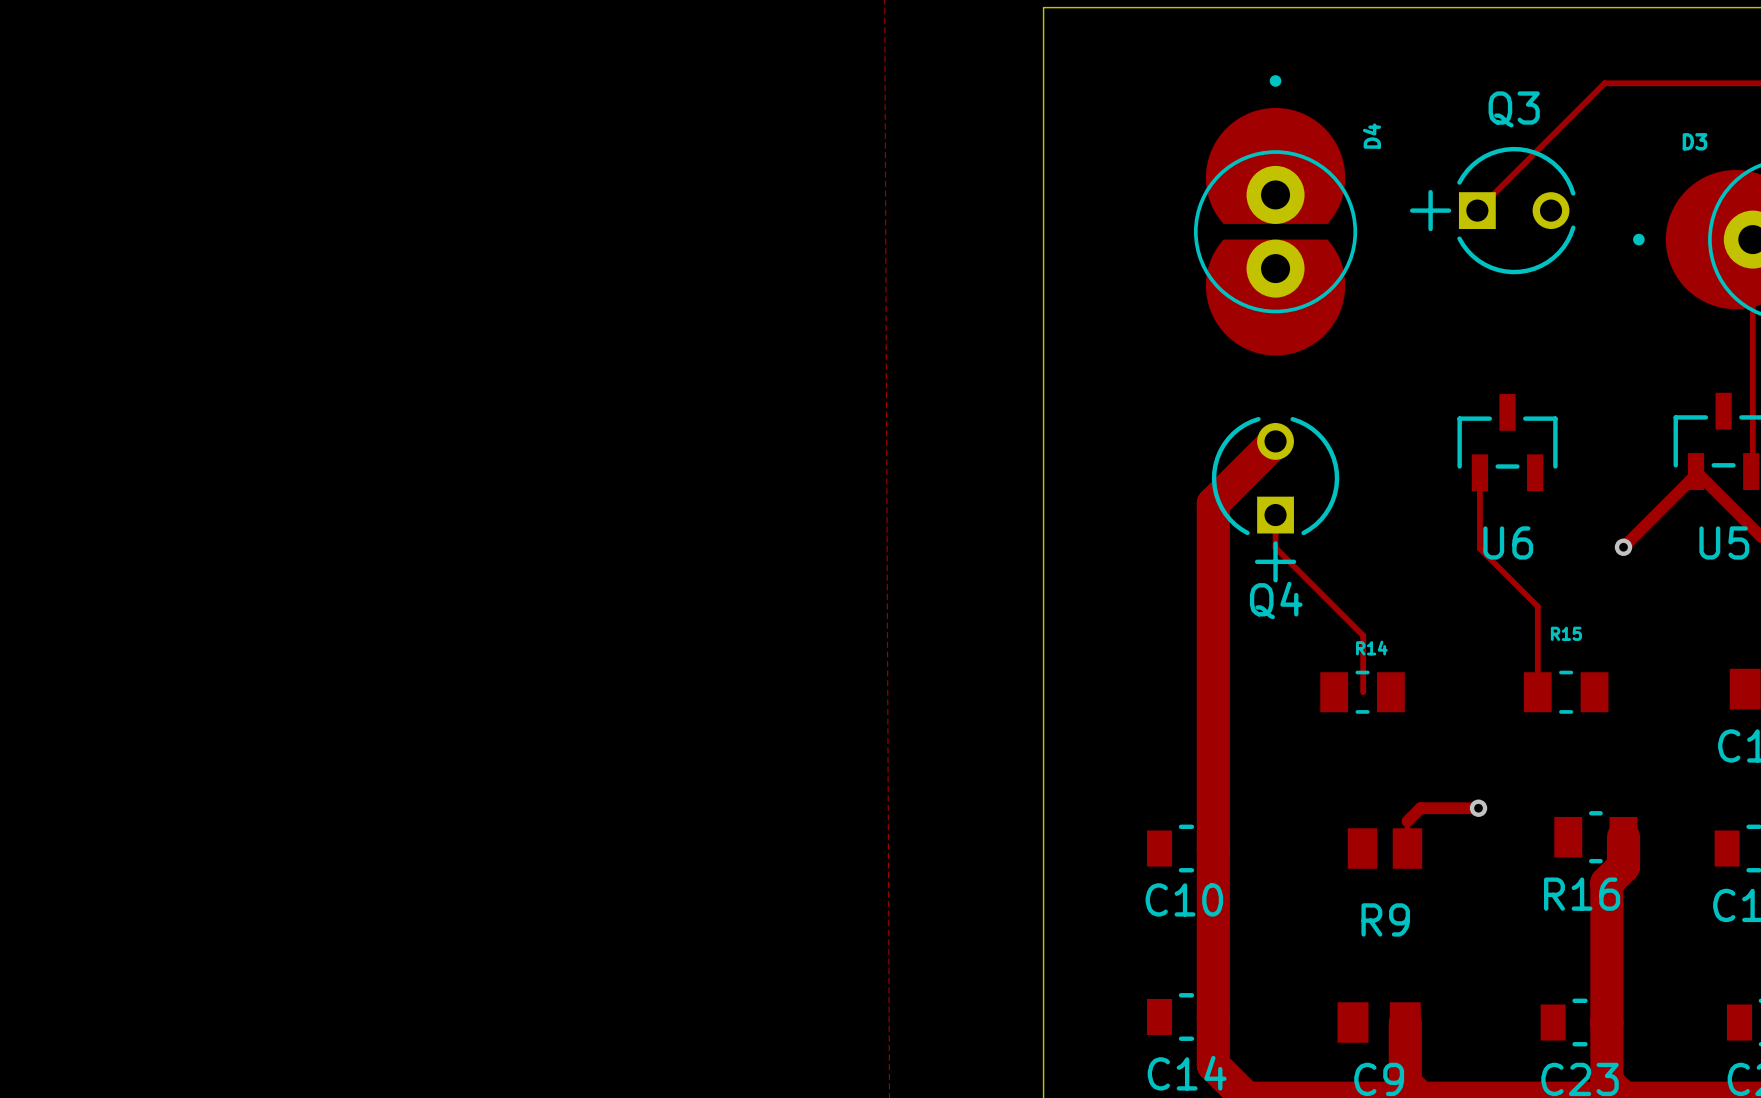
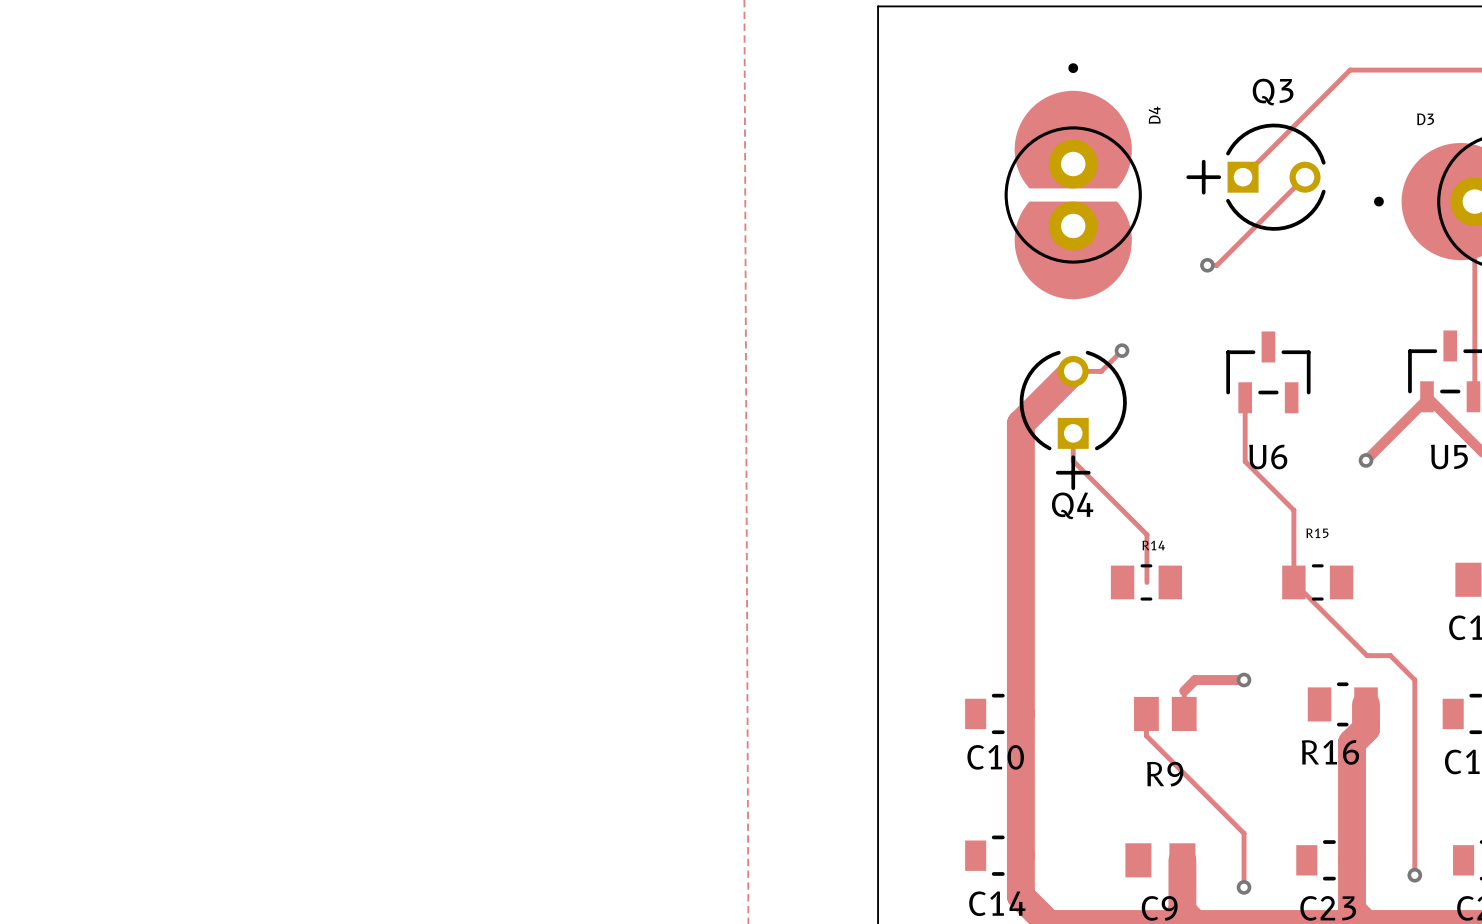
track: none -> (1305, 177) (1216, 265) (1207, 265)
via: none -> (1207, 265)
track: none -> (1122, 350) (1101, 371) (1073, 371)
via: none -> (1122, 350)
track: none -> (1293, 582) (1367, 655) (1390, 655) (1414, 680) (1414, 875)
track: none -> (1146, 713) (1146, 735) (1244, 833) (1244, 887)
via: none -> (1414, 875)
via: none -> (1244, 887)

